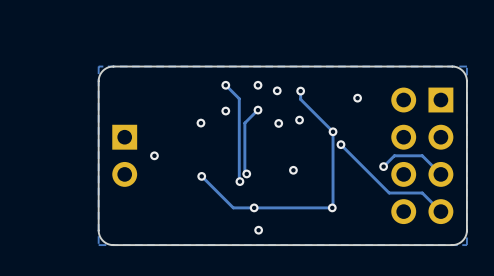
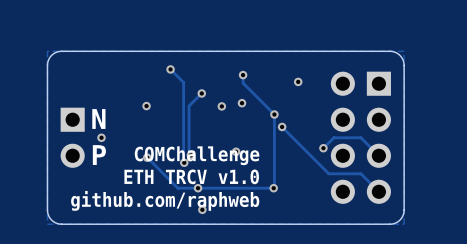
via: (258, 85) -> none
via: (277, 90) -> none
via: (225, 111) -> none
text: none -> N (98, 119)
text: none -> P (99, 155)
text: none -> COMChallenge (197, 155)
text: none -> ETH TRCV v1.0 (191, 176)
text: none -> github.com/raphweb (165, 200)

